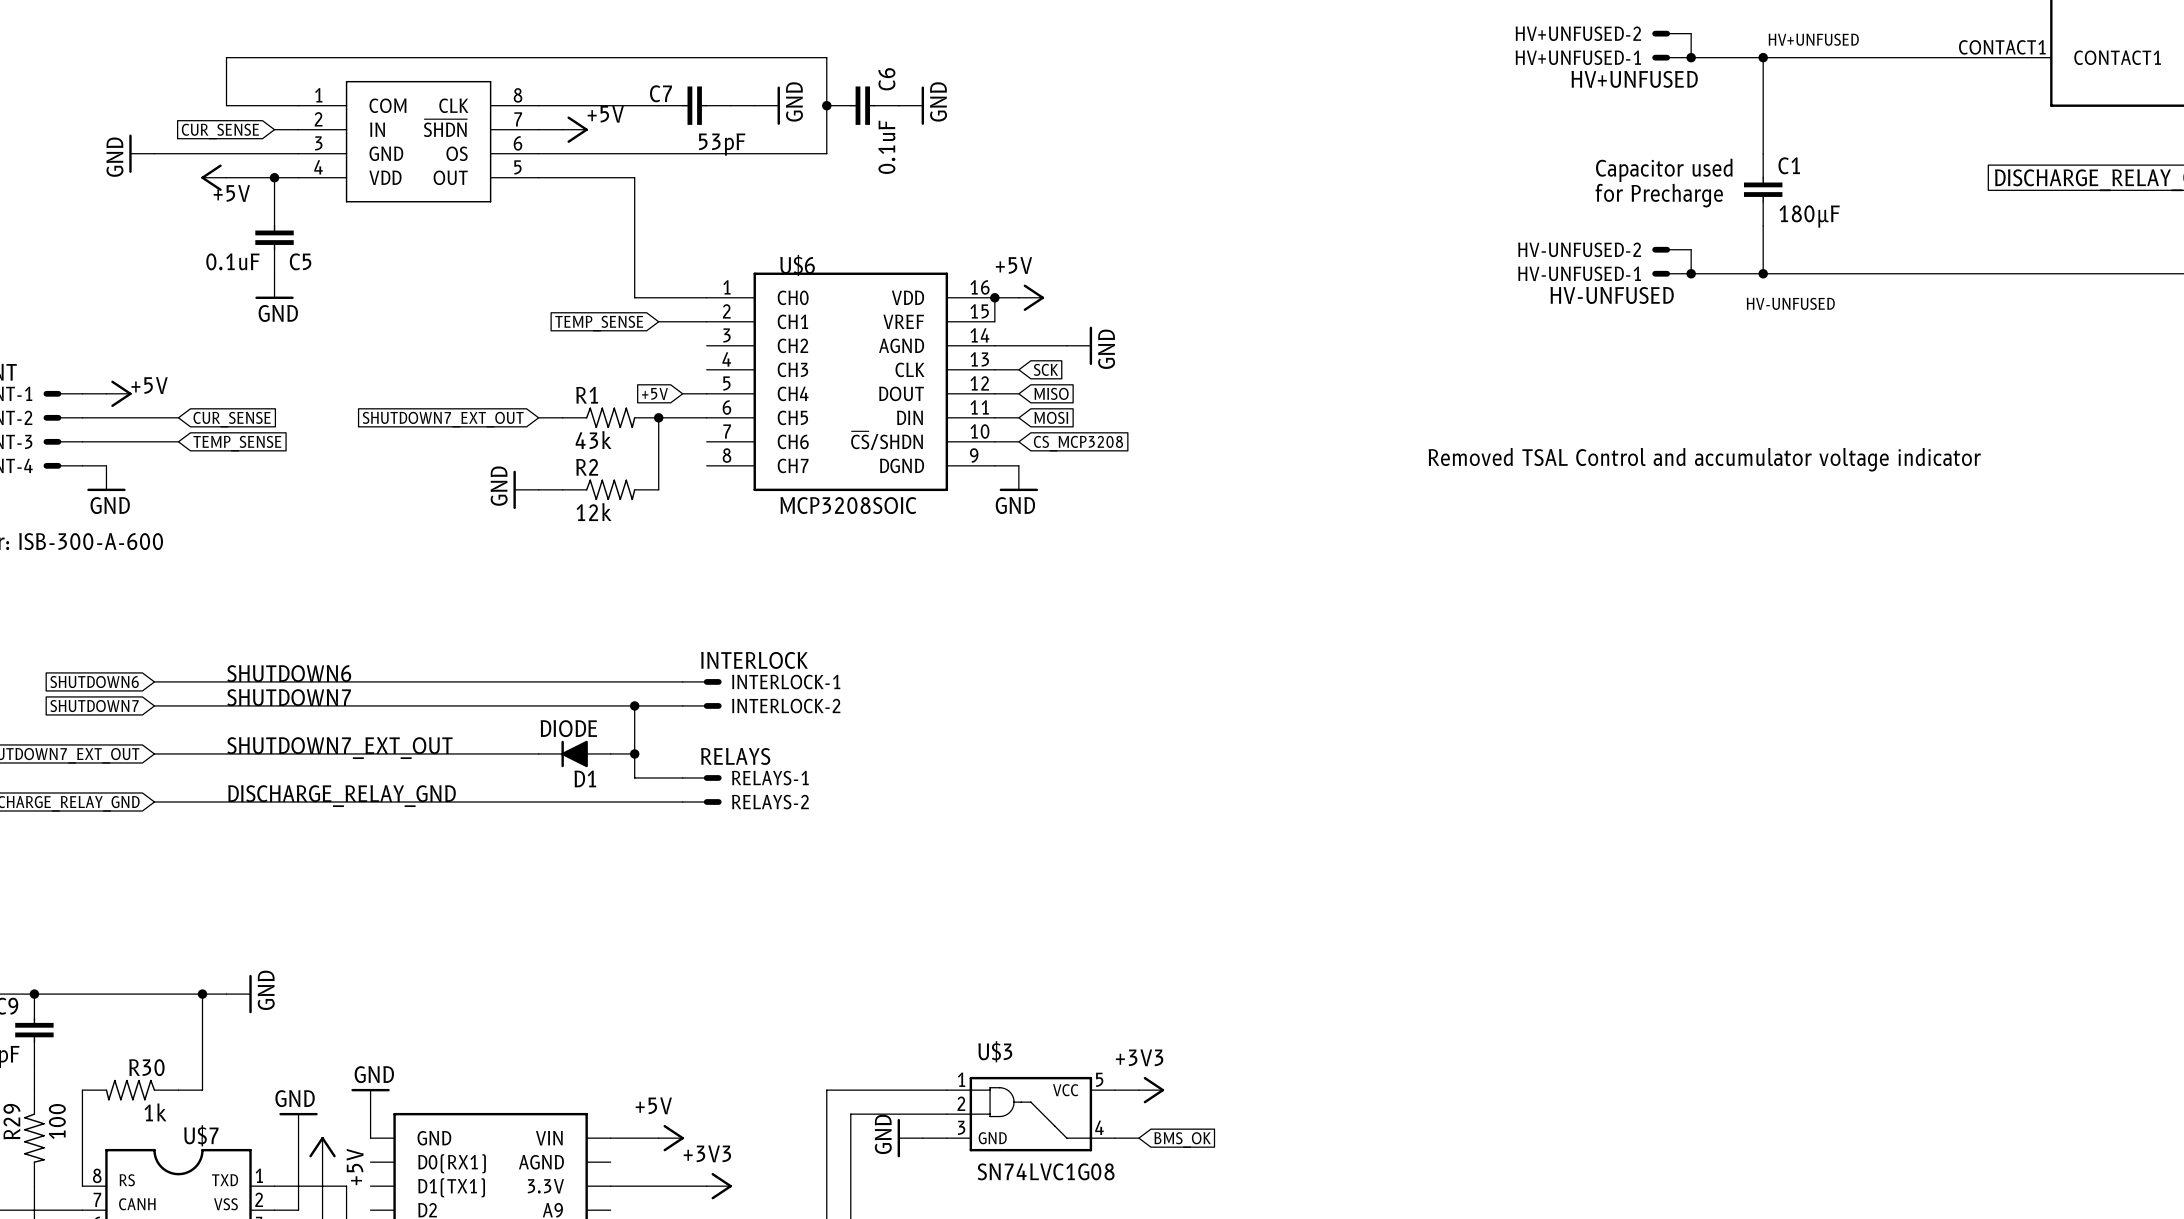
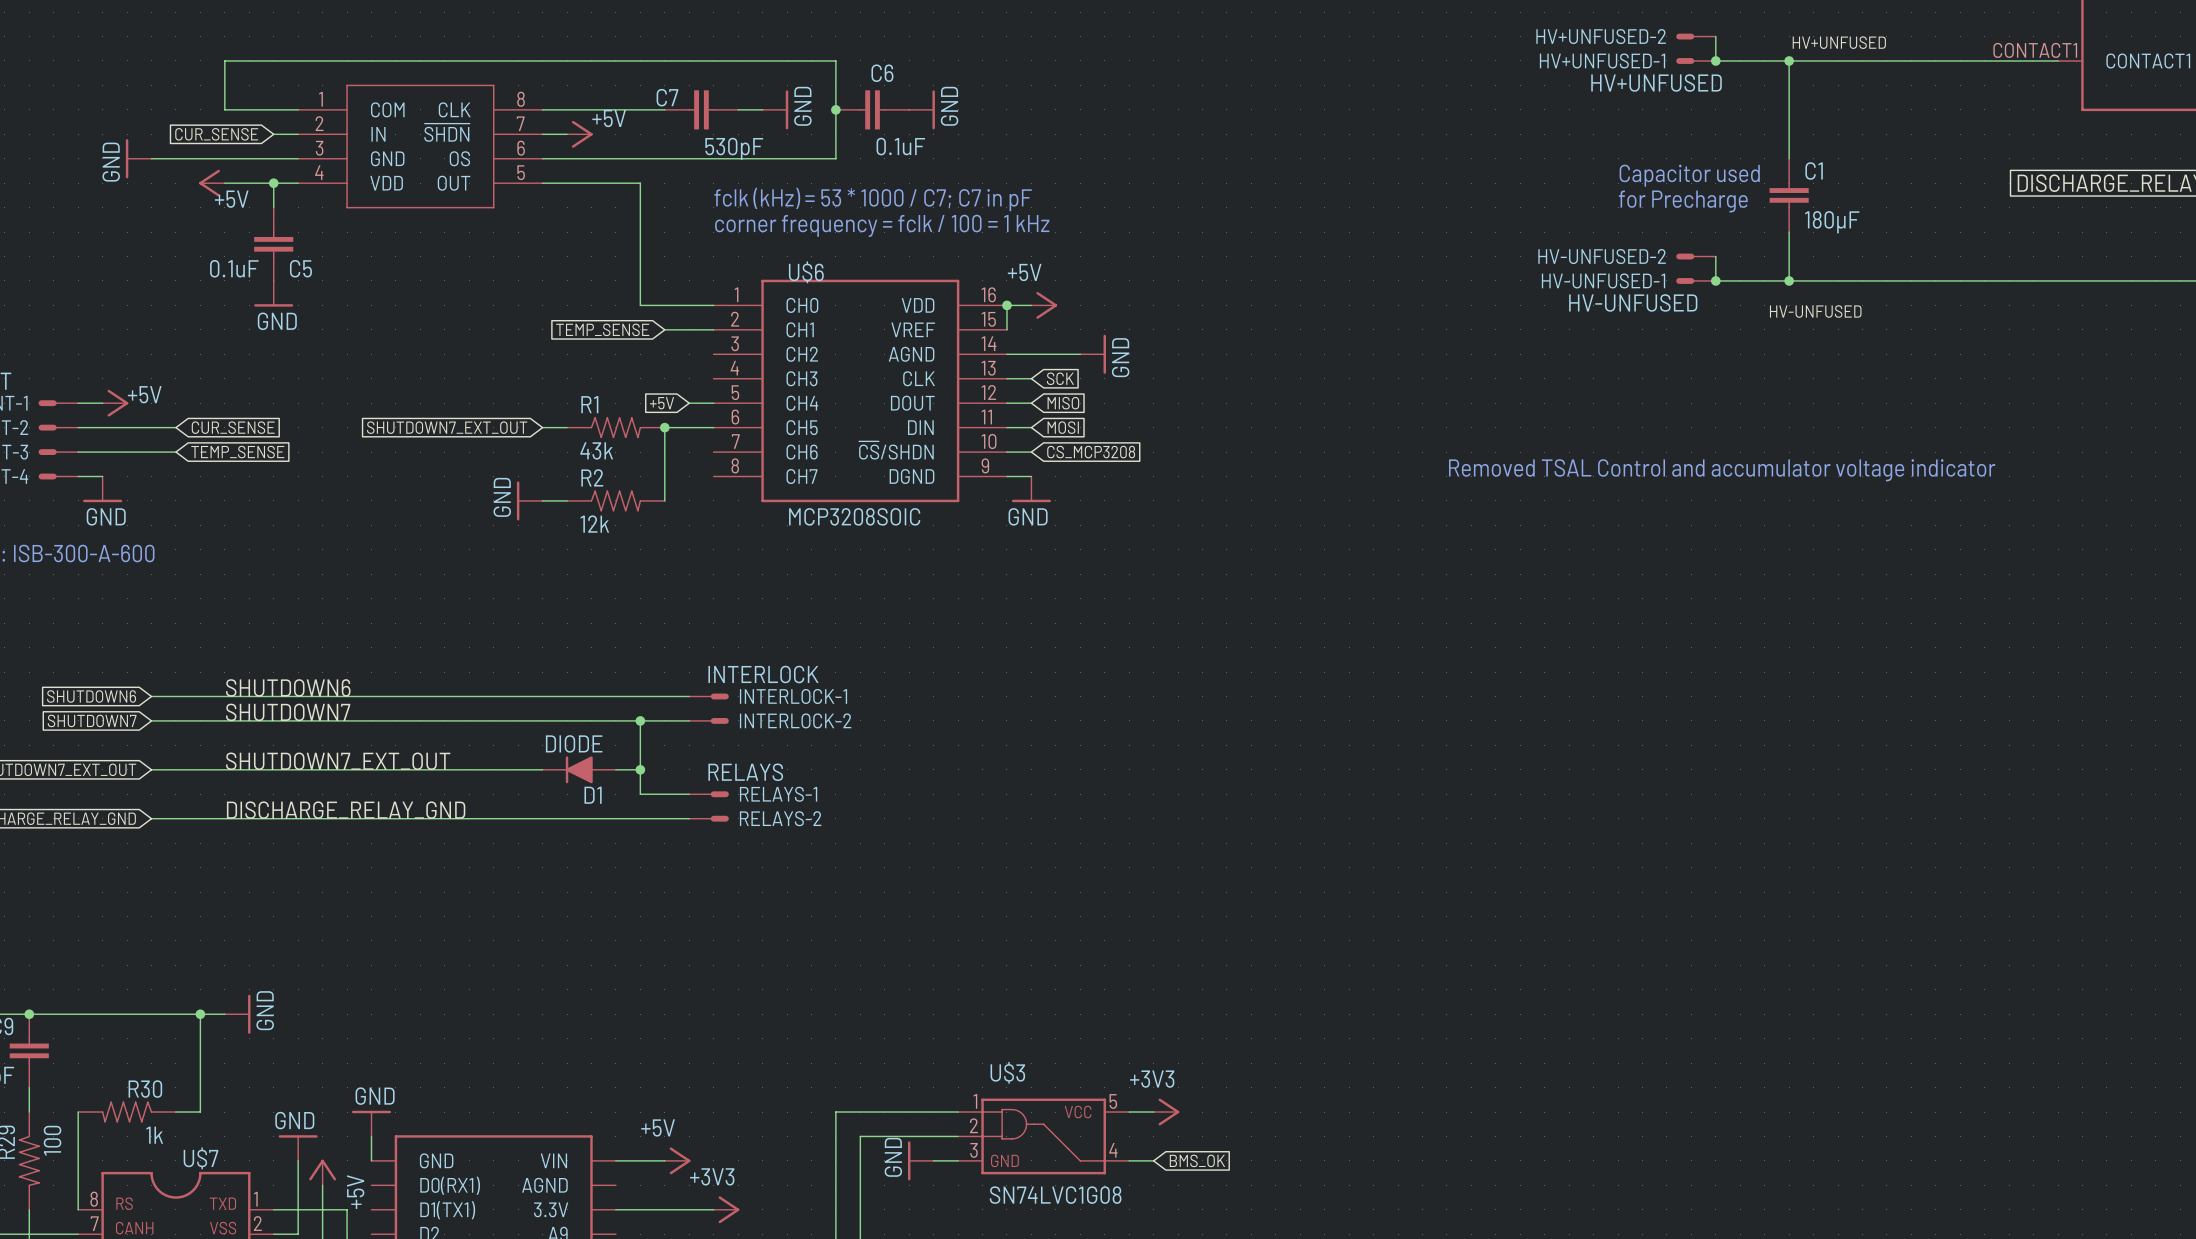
C6 name rotation: 0° (886, 79) -> 90° clockwise (882, 73)
C7 value: 53pF (722, 144) -> 530pF (734, 148)
C6 value rotation: 0° (886, 147) -> 90° clockwise (900, 146)
text: none -> fclk (kHz) = 53 * 1000 / C7; C7 in pF (873, 199)
text: none -> corner frequency = fclk / 100 = 1 kHz (882, 225)

